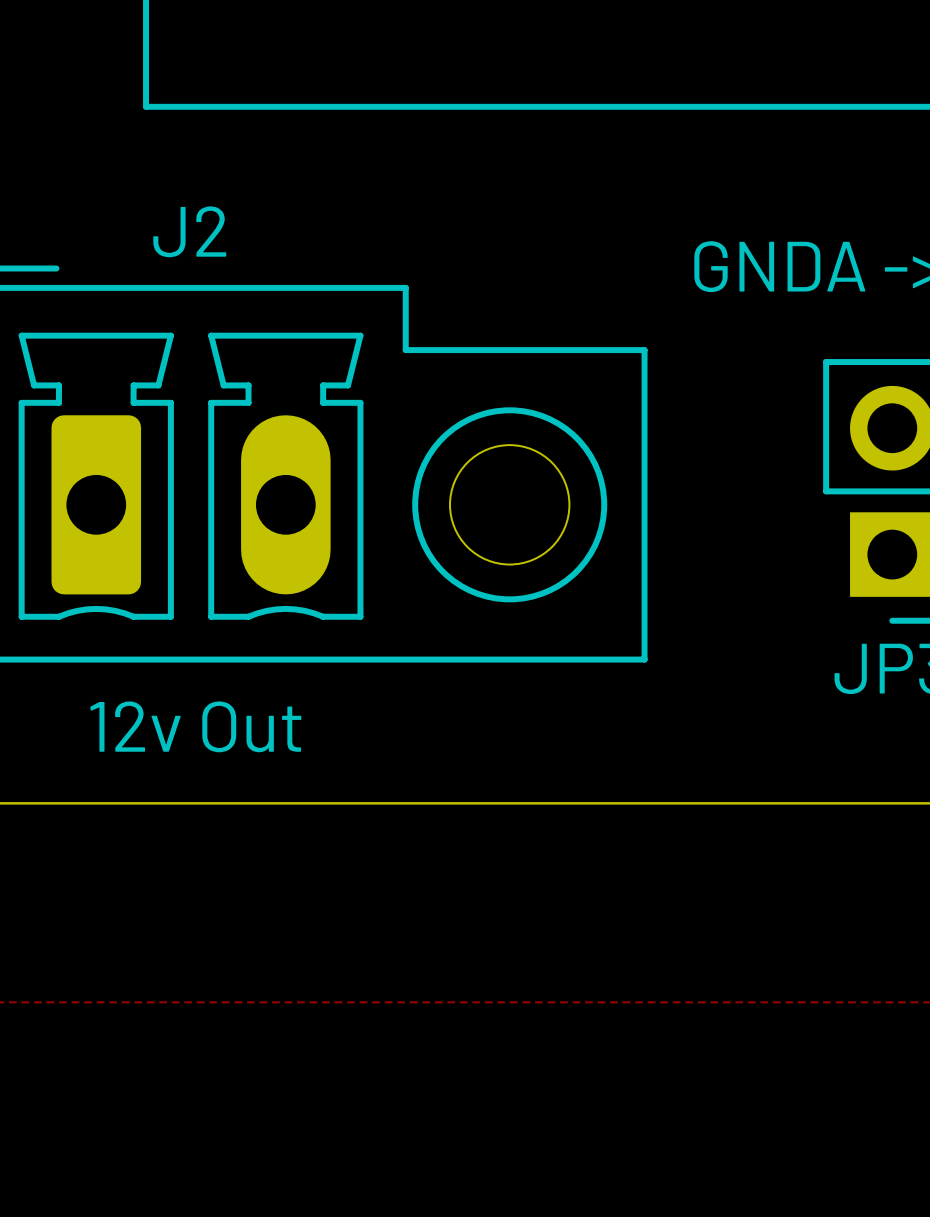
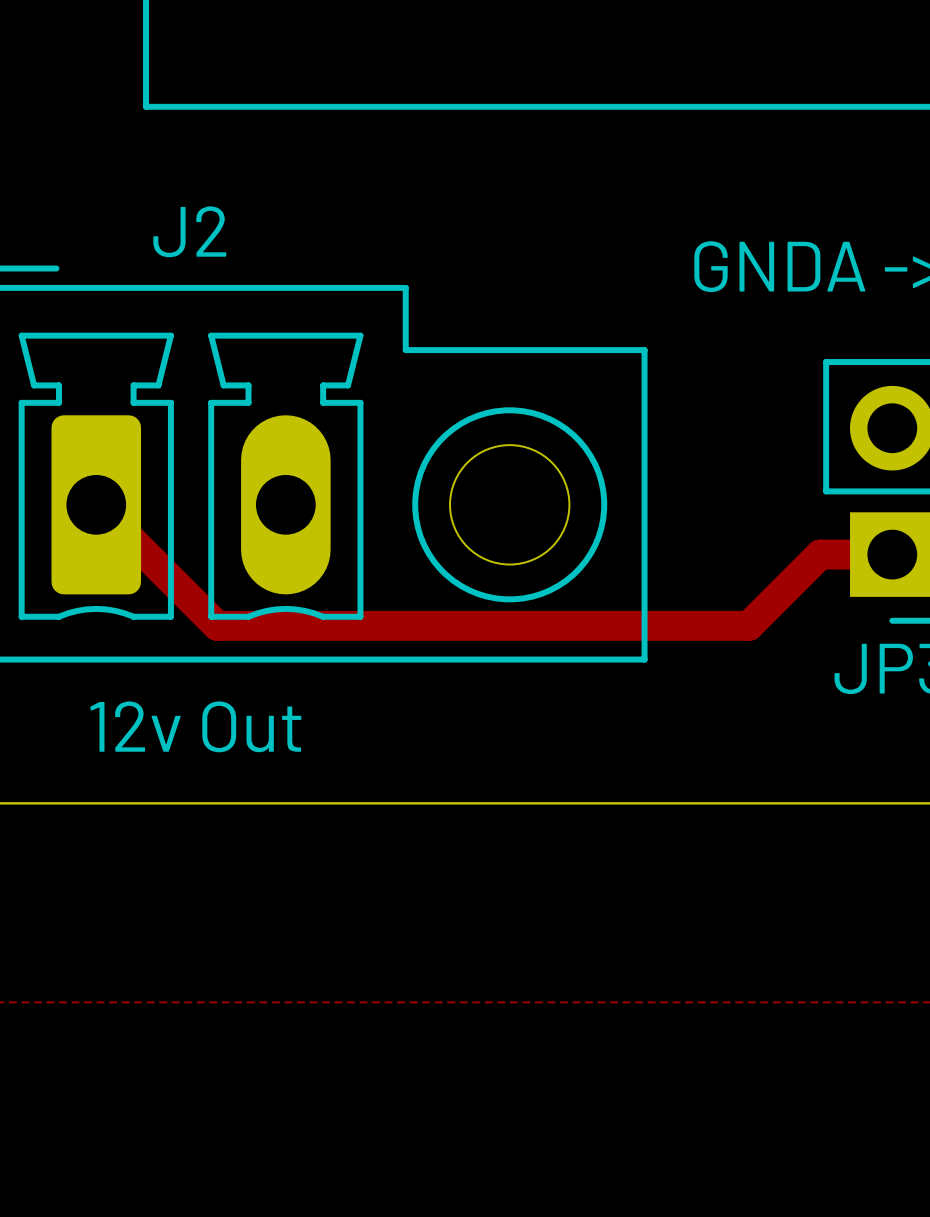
track: none -> (96, 504) (217, 625) (748, 625) (820, 554) (892, 554)

